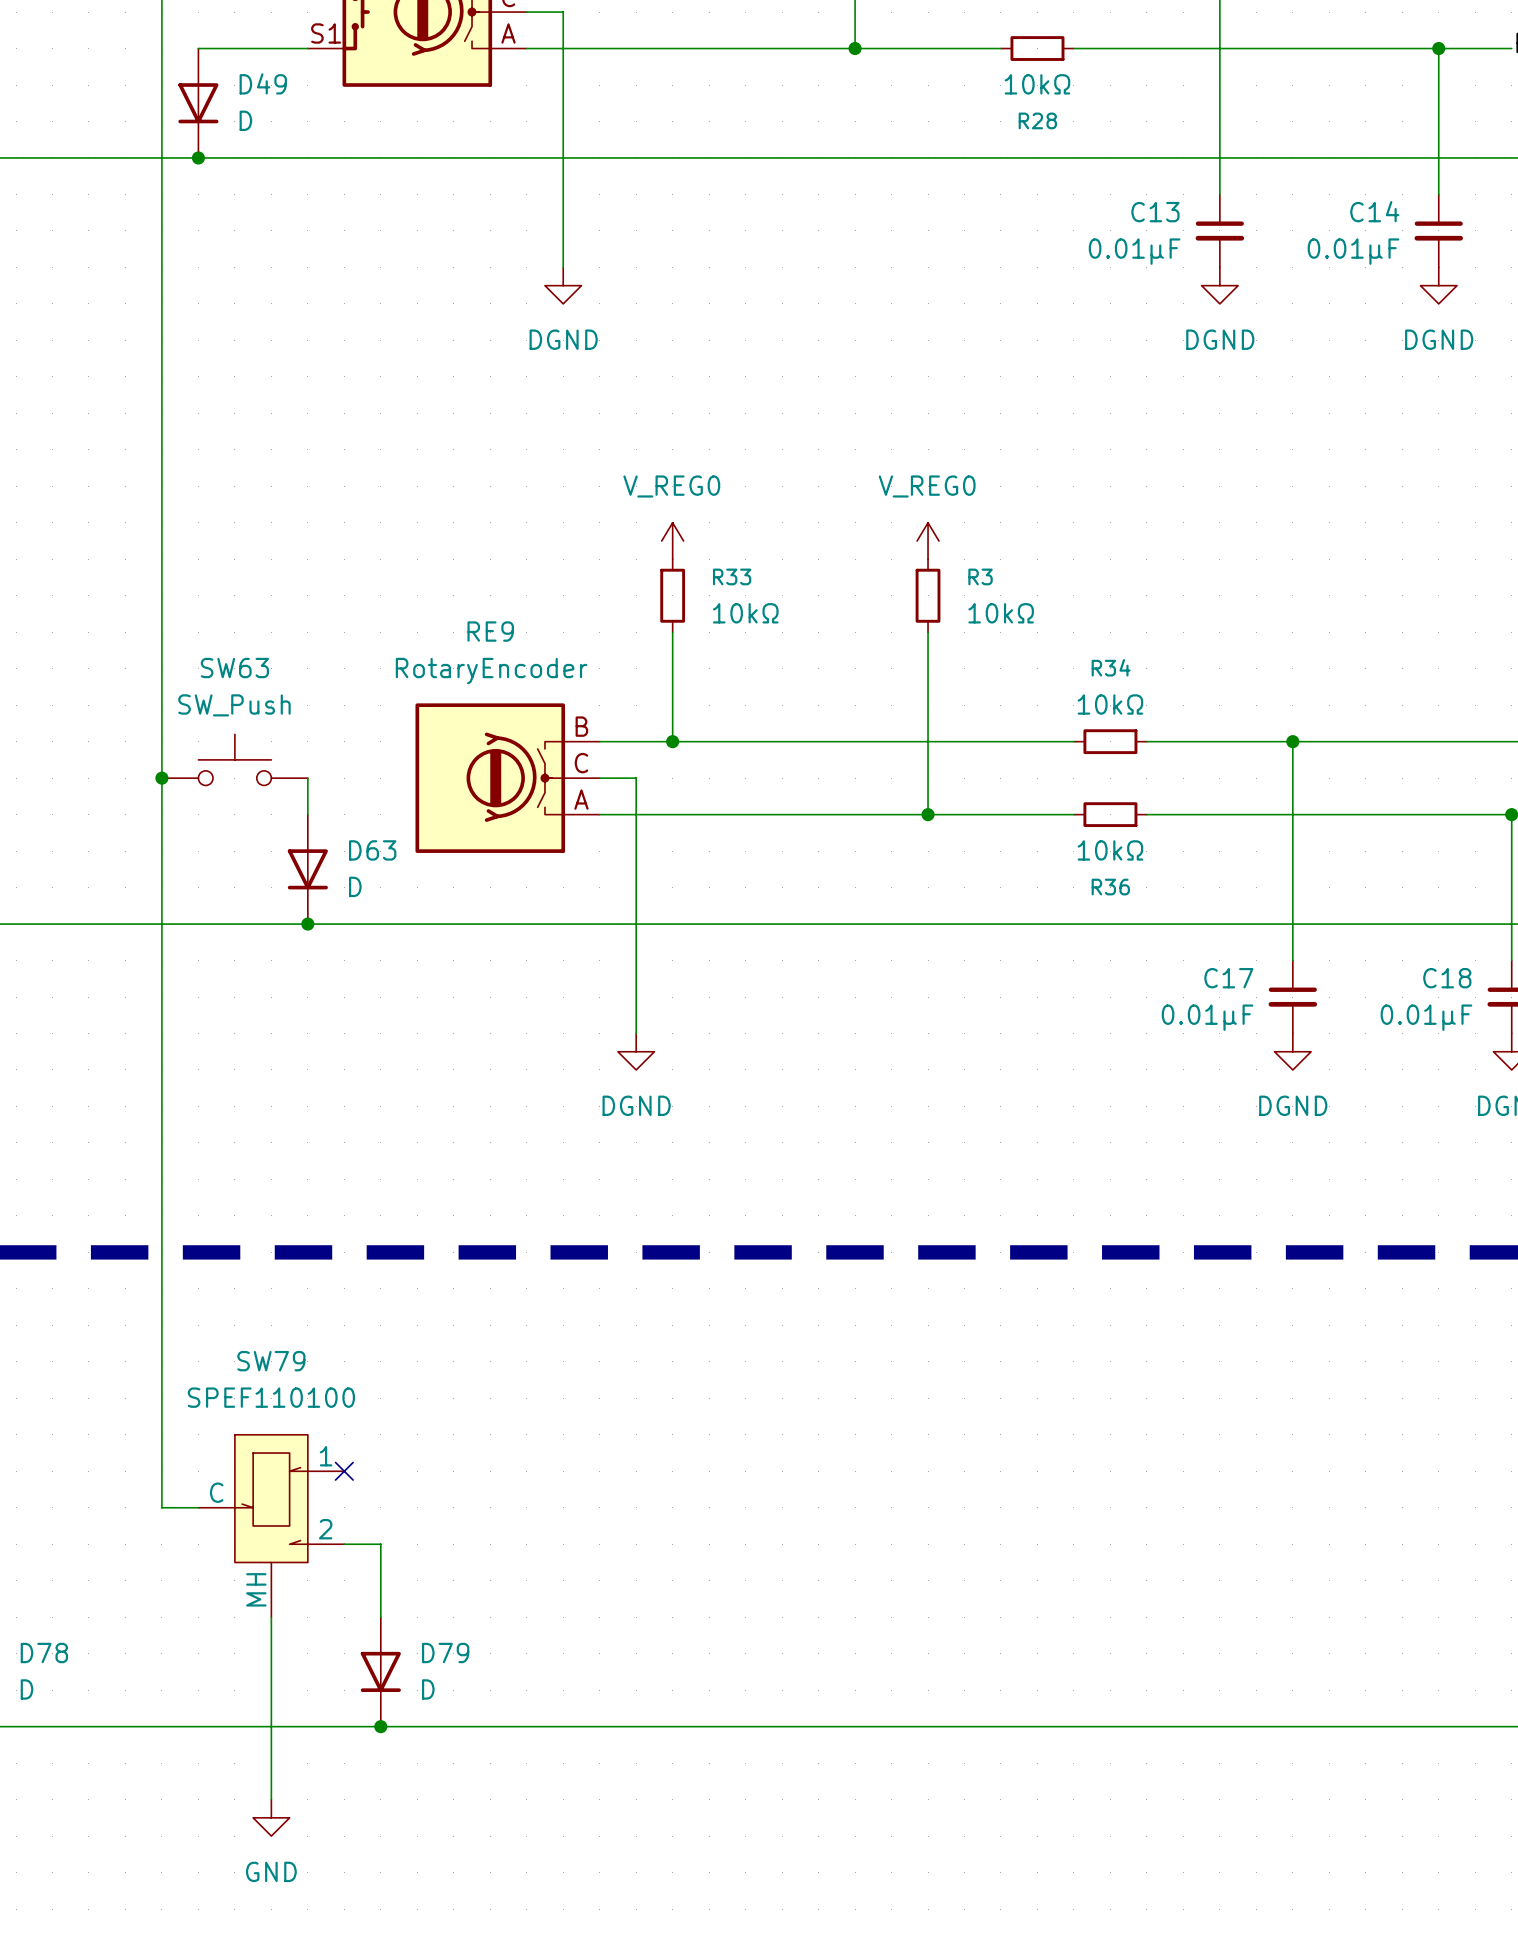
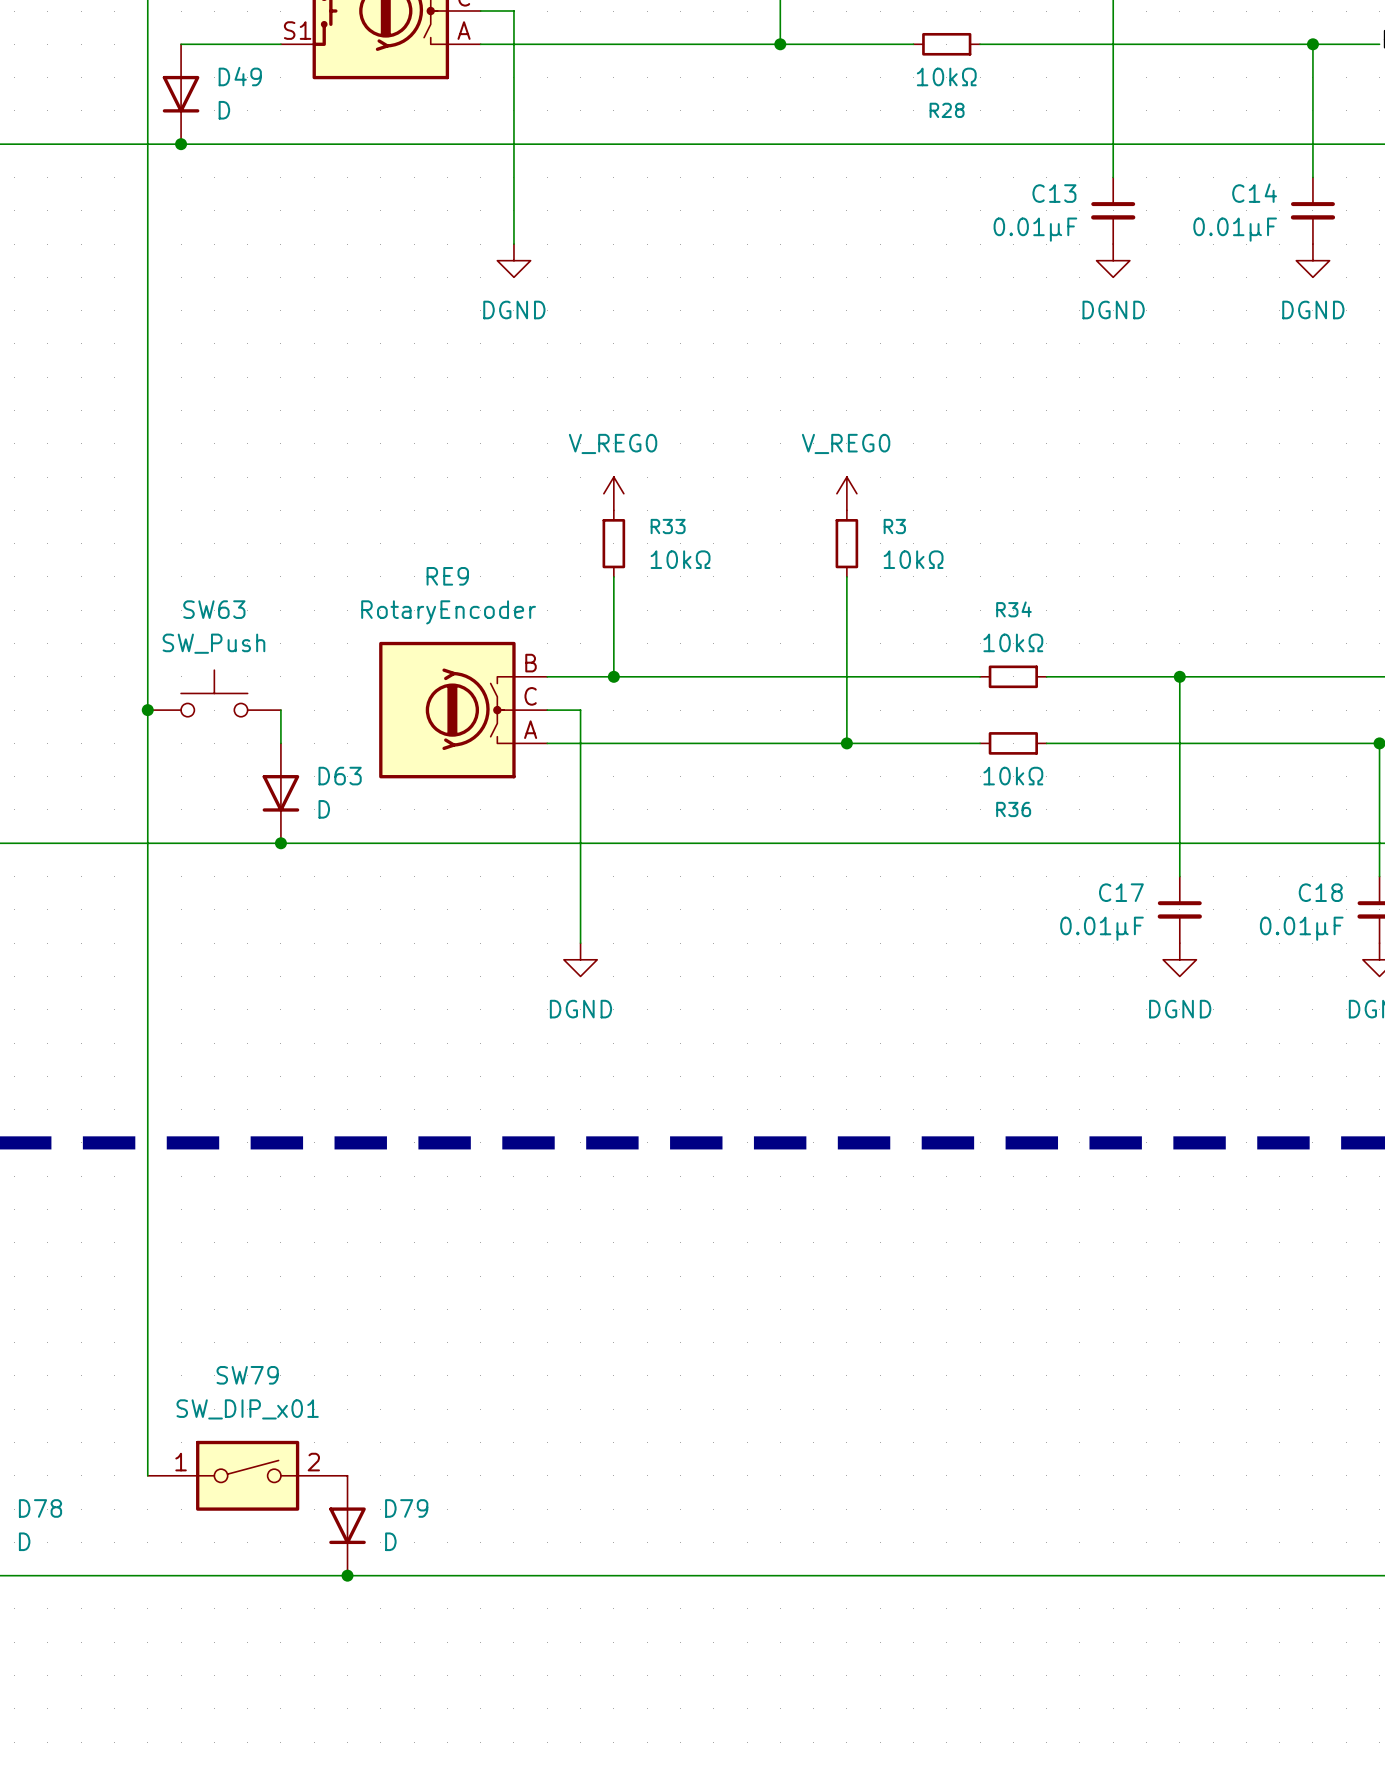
SW79 name position: SW79 (271, 1361) -> SW79 (247, 1375)
SW79 value: SPEF110100 (271, 1397) -> SW_DIP_x01 (247, 1409)
SW79 symbol: [198, 1434, 345, 1618] -> [147, 1440, 348, 1511]
no-connect mark: (344, 1471) -> none
wire: (161, 1507) (198, 1507) -> (147, 1375) (147, 1475)
wire: (344, 1544) (380, 1544) (380, 1617) -> none
wire: (271, 1617) (271, 1799) -> none
power symbol: GND (271, 1817) -> none

